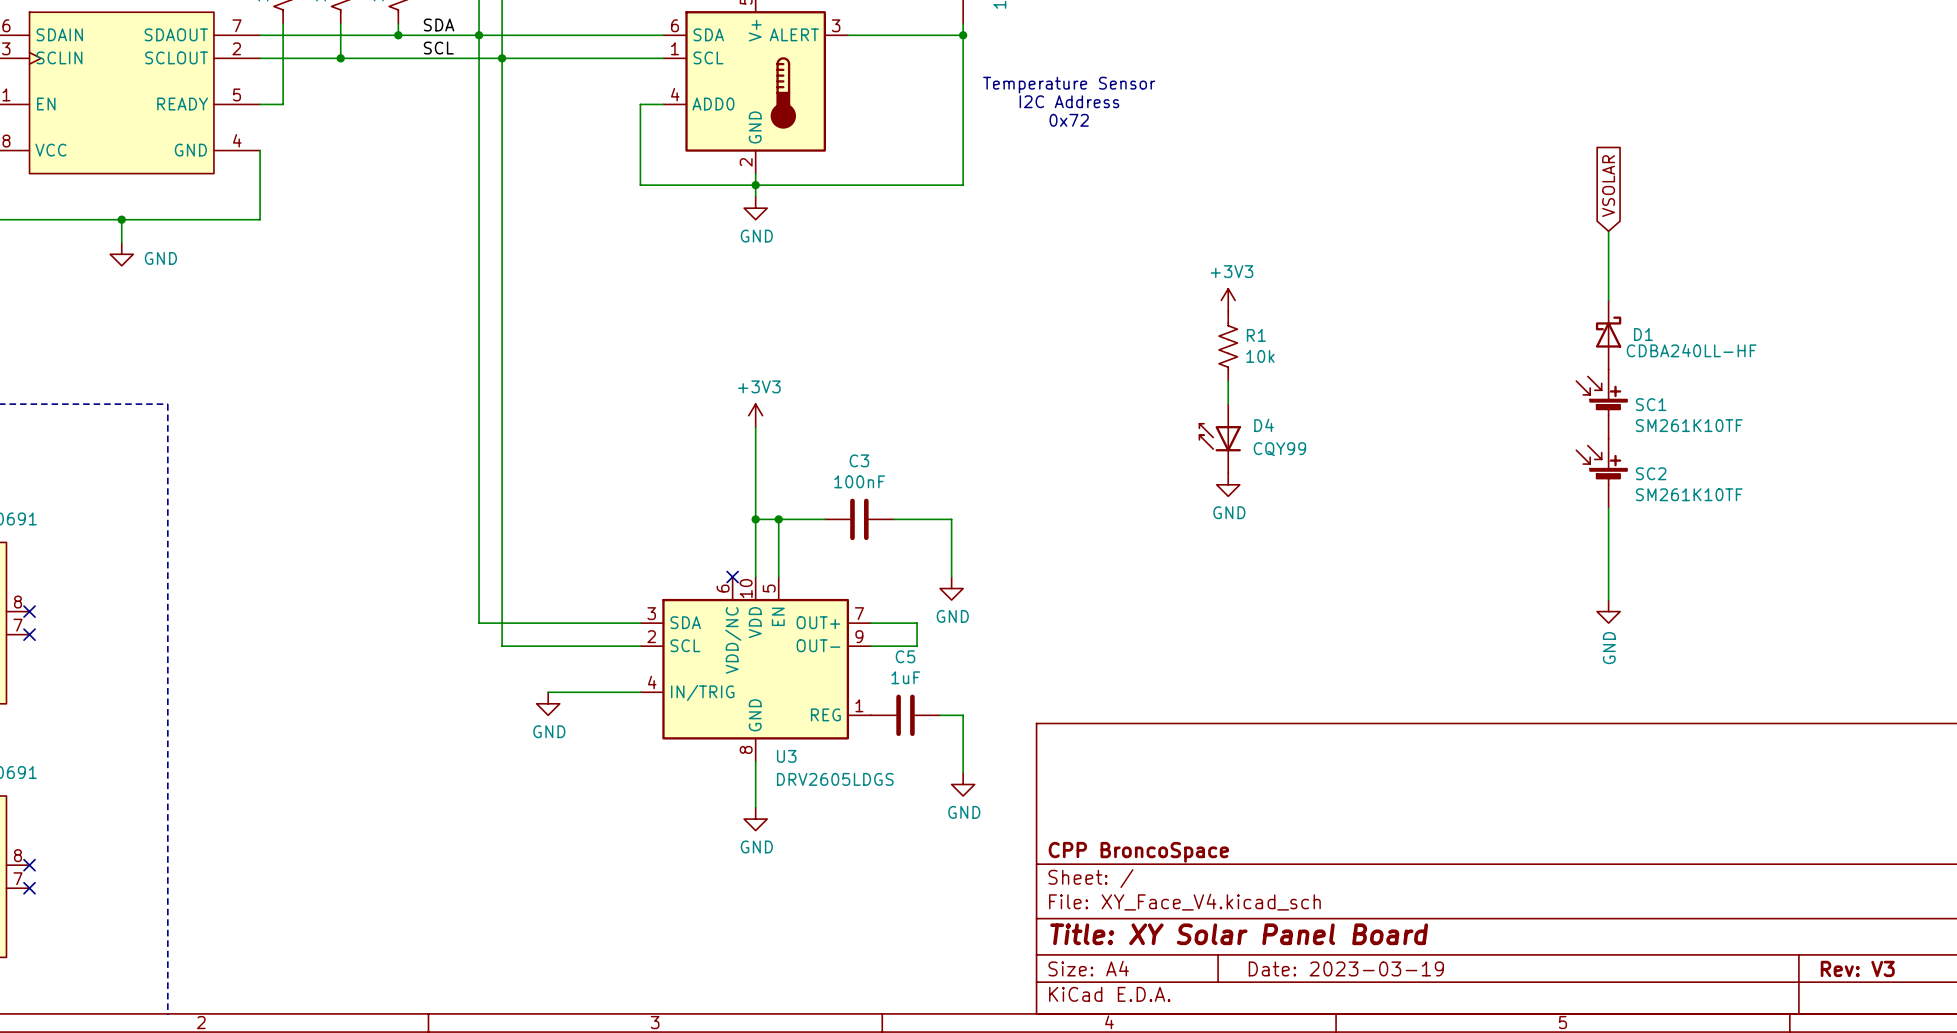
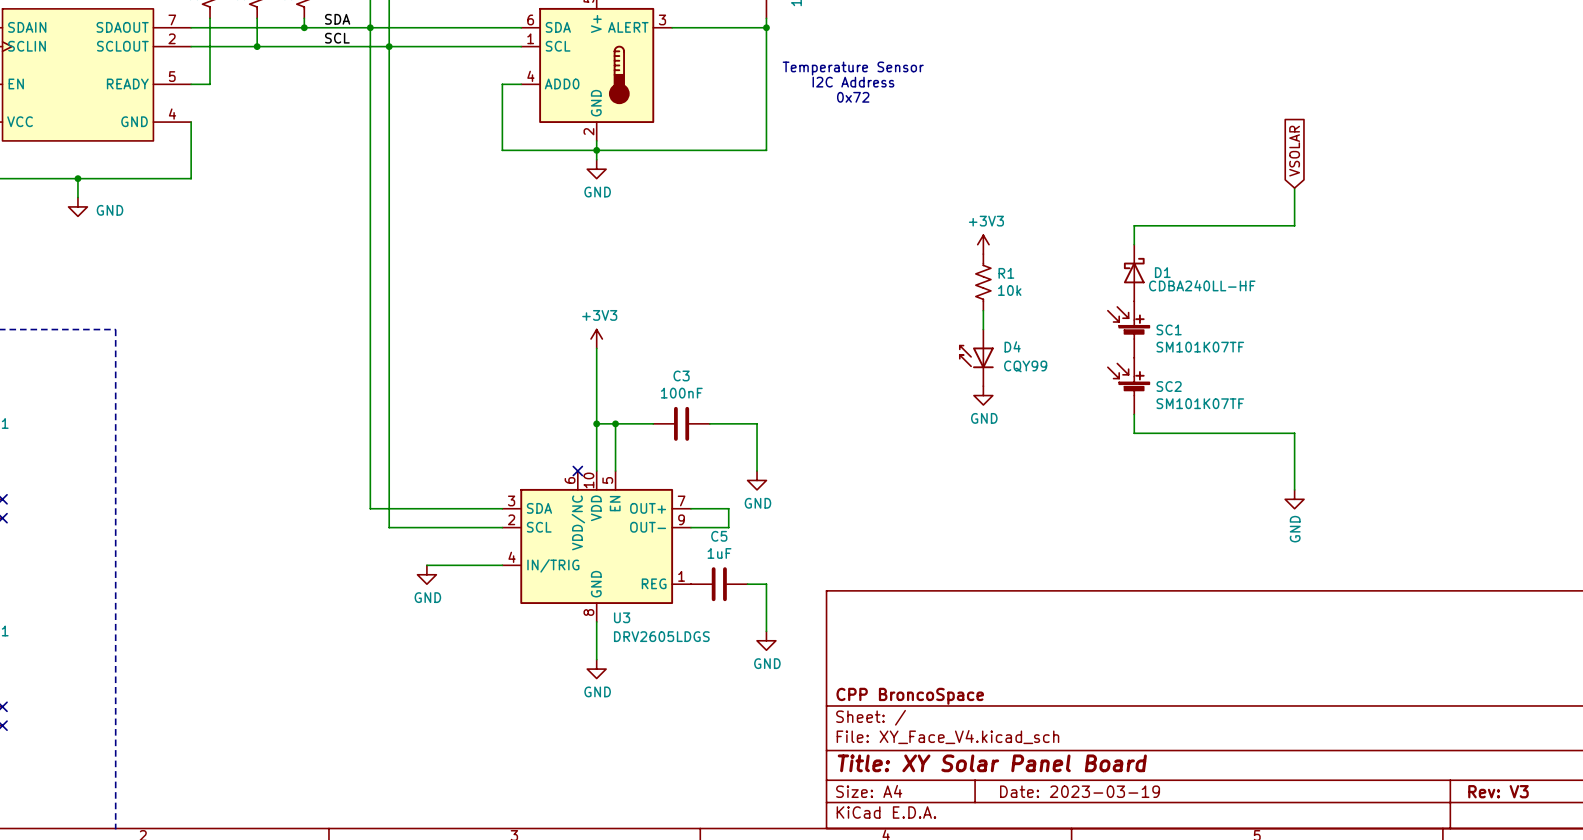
wire: (1608, 277) (1608, 300) -> (1294, 225) (1134, 225) (1134, 244)
D1 position: (1608, 334) -> (1134, 272)
SC1 position: (1601, 404) -> (1128, 329)
SC1 value: SM261K10TF (1689, 425) -> SM101K07TF (1200, 347)
SC2 position: (1601, 473) -> (1128, 386)
SC2 value: SM261K10TF (1689, 494) -> SM101K07TF (1200, 403)
wire: (1608, 507) (1608, 530) -> (1134, 414) (1134, 433) (1294, 433)

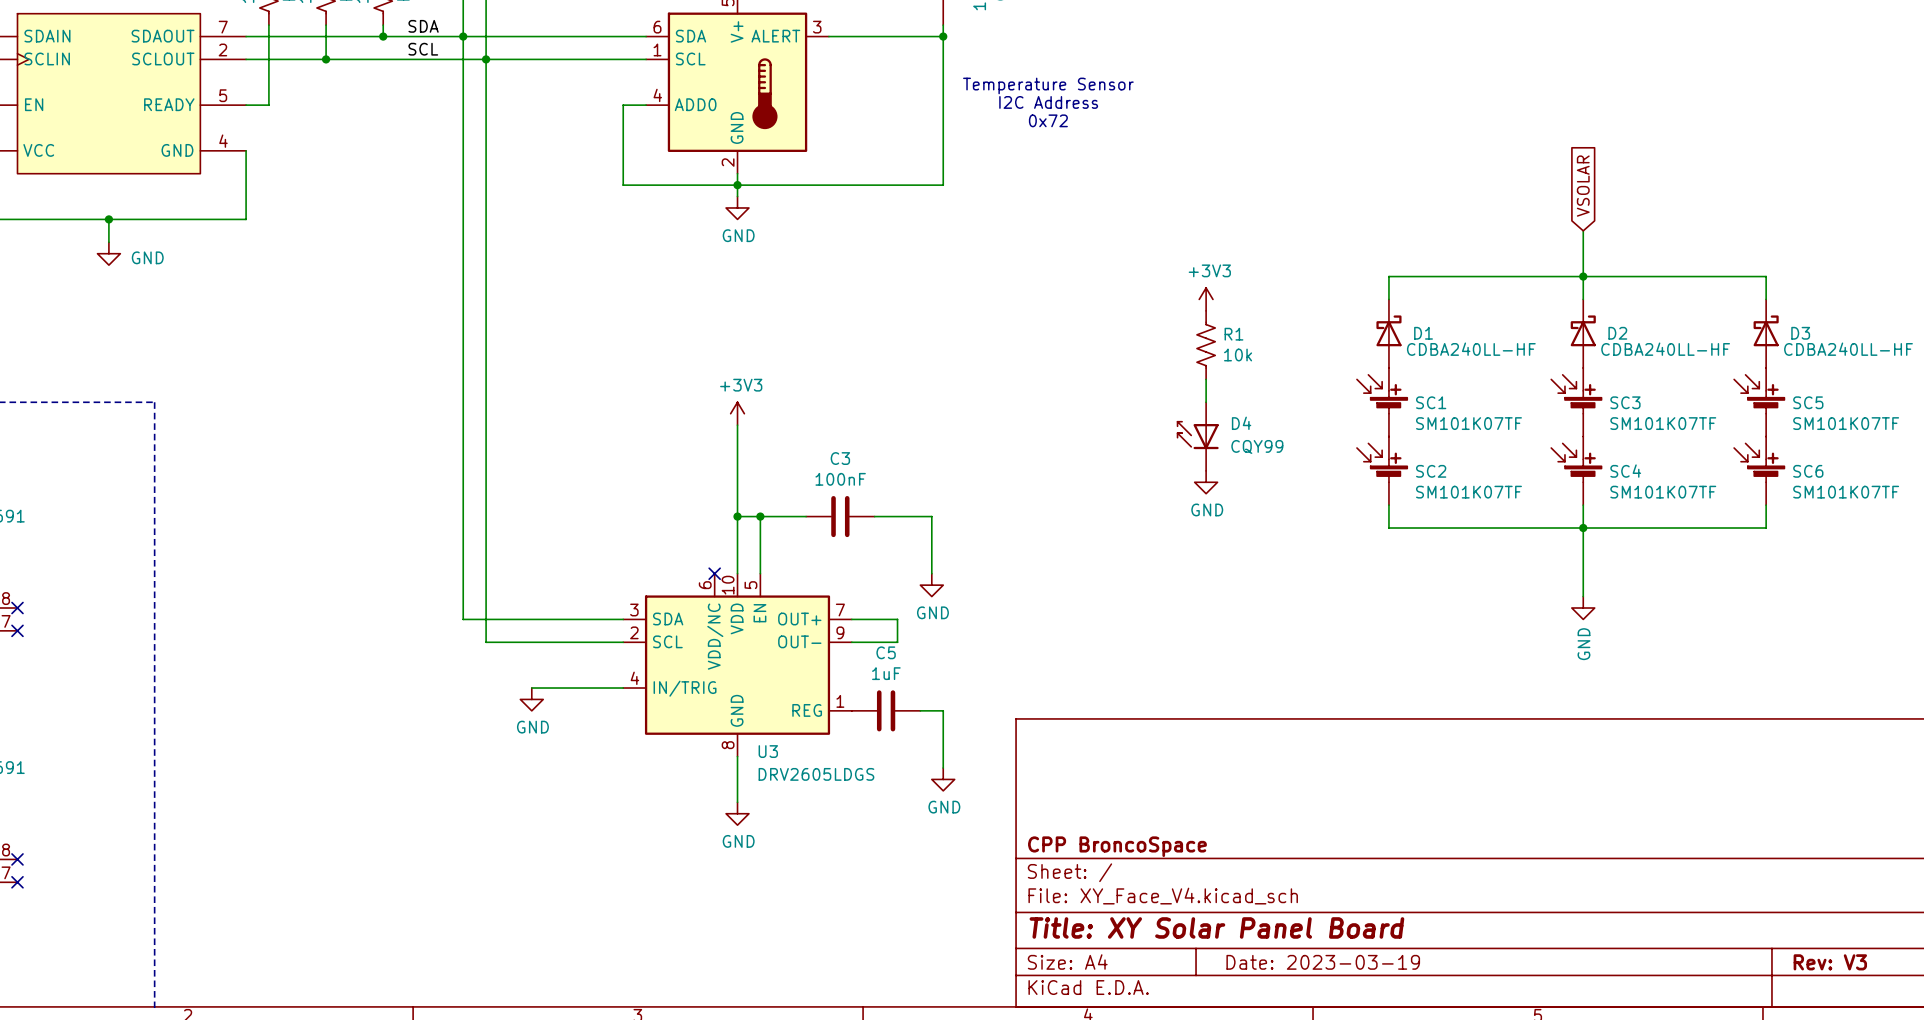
junction: none -> (1583, 276)
wire: none -> (1583, 299) (1583, 276) (1766, 276) (1766, 299)
D2: none -> CDBA240LL-HF (1583, 333)
D3: none -> CDBA240LL-HF (1766, 333)
SC3: none -> SM101K07TF (1576, 402)
SC5: none -> SM101K07TF (1759, 402)
SC4: none -> SM101K07TF (1576, 470)
SC6: none -> SM101K07TF (1759, 470)
wire: none -> (1583, 505) (1583, 528) (1766, 528) (1766, 505)
junction: none -> (1583, 528)

